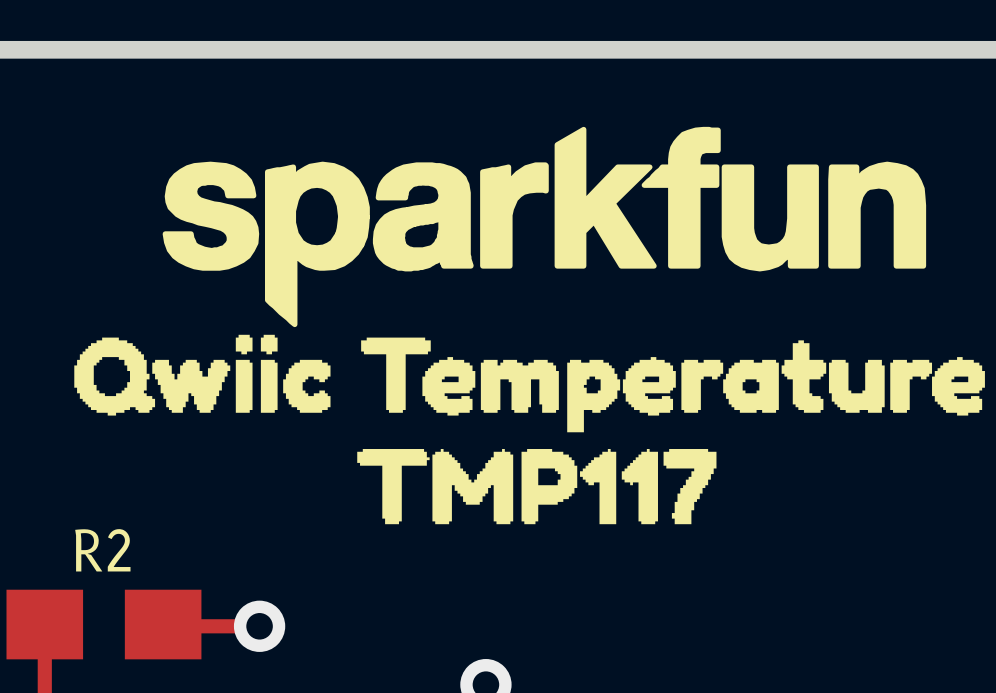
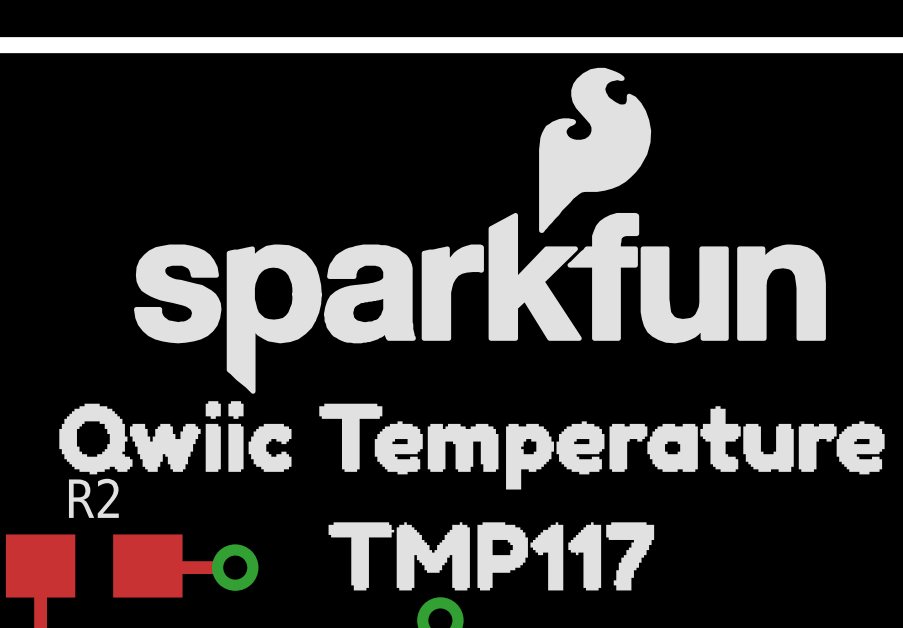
drawing shape: [162, 126, 927, 328] -> [134, 67, 826, 394]
drawing position: (529, 383) -> (471, 445)
drawing position: (536, 486) -> (491, 556)

